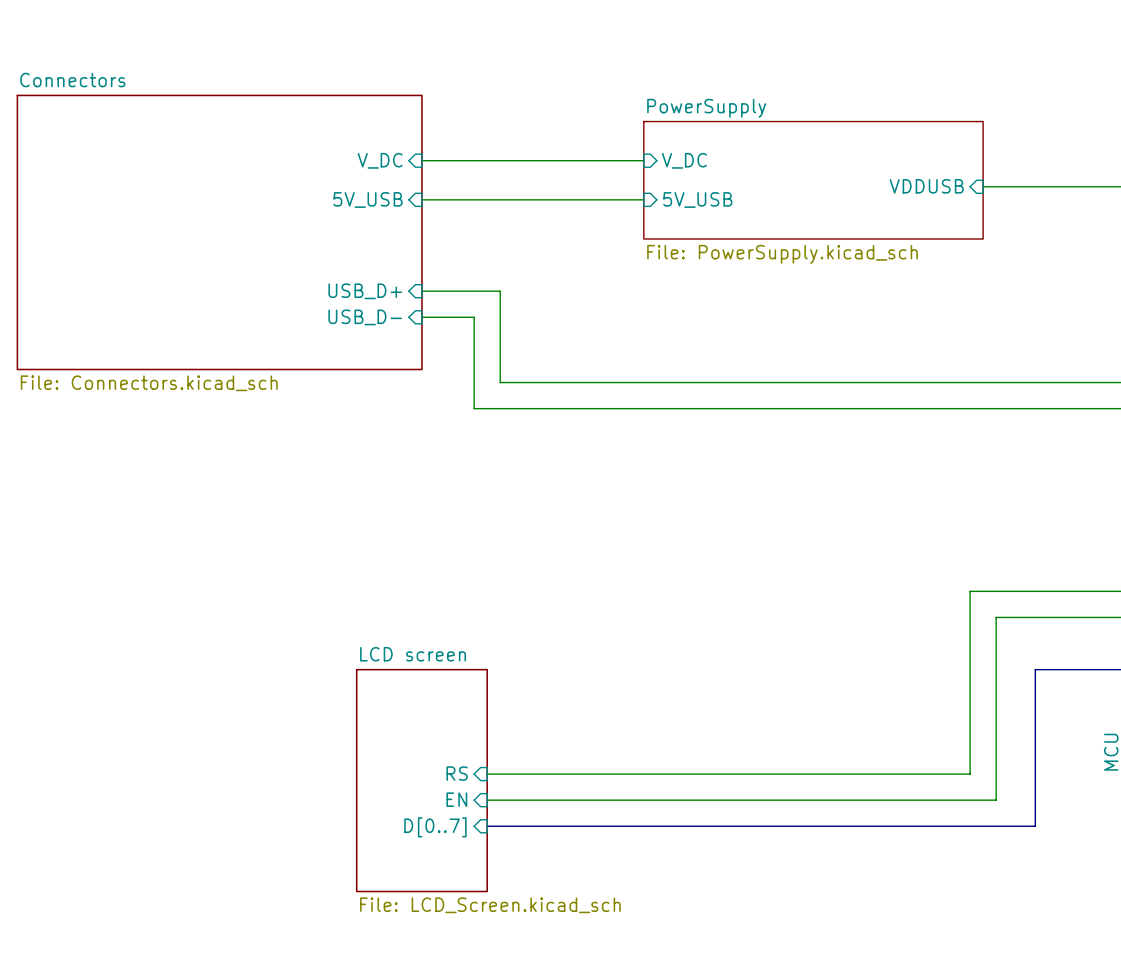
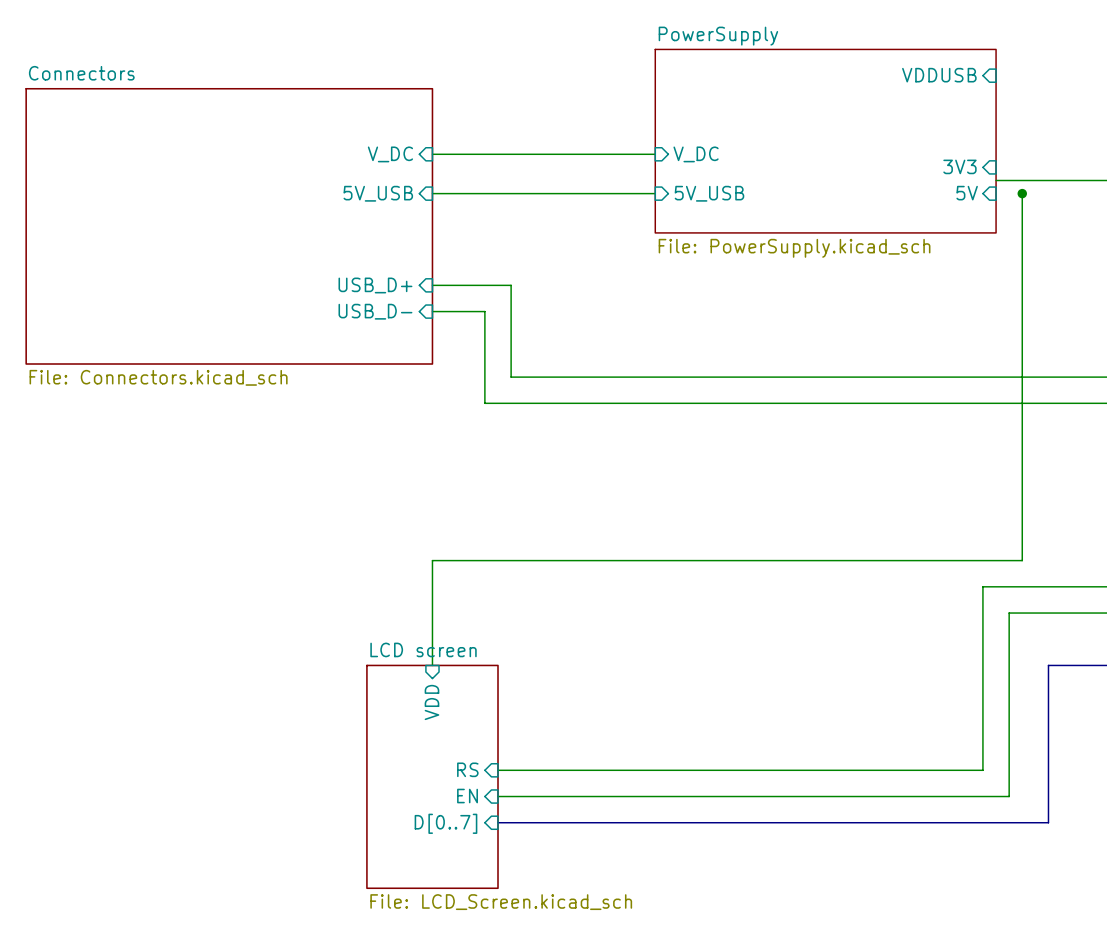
sheet PowerSupply: none -> File: PowerSupply.kicad_sch (825, 141)
sheet pin: none -> 3V3 (959, 166)
sheet PowerSupply: File: PowerSupply.kicad_sch (813, 180) -> none
sheet pin position: VDDUSB (926, 186) -> VDDUSB (939, 75)
sheet pin: none -> 5V (967, 193)
wire: none -> (1022, 193) (1022, 560) (432, 560) (432, 665)
junction: none -> (1022, 193)
sheet pin: none -> VDD (431, 702)

